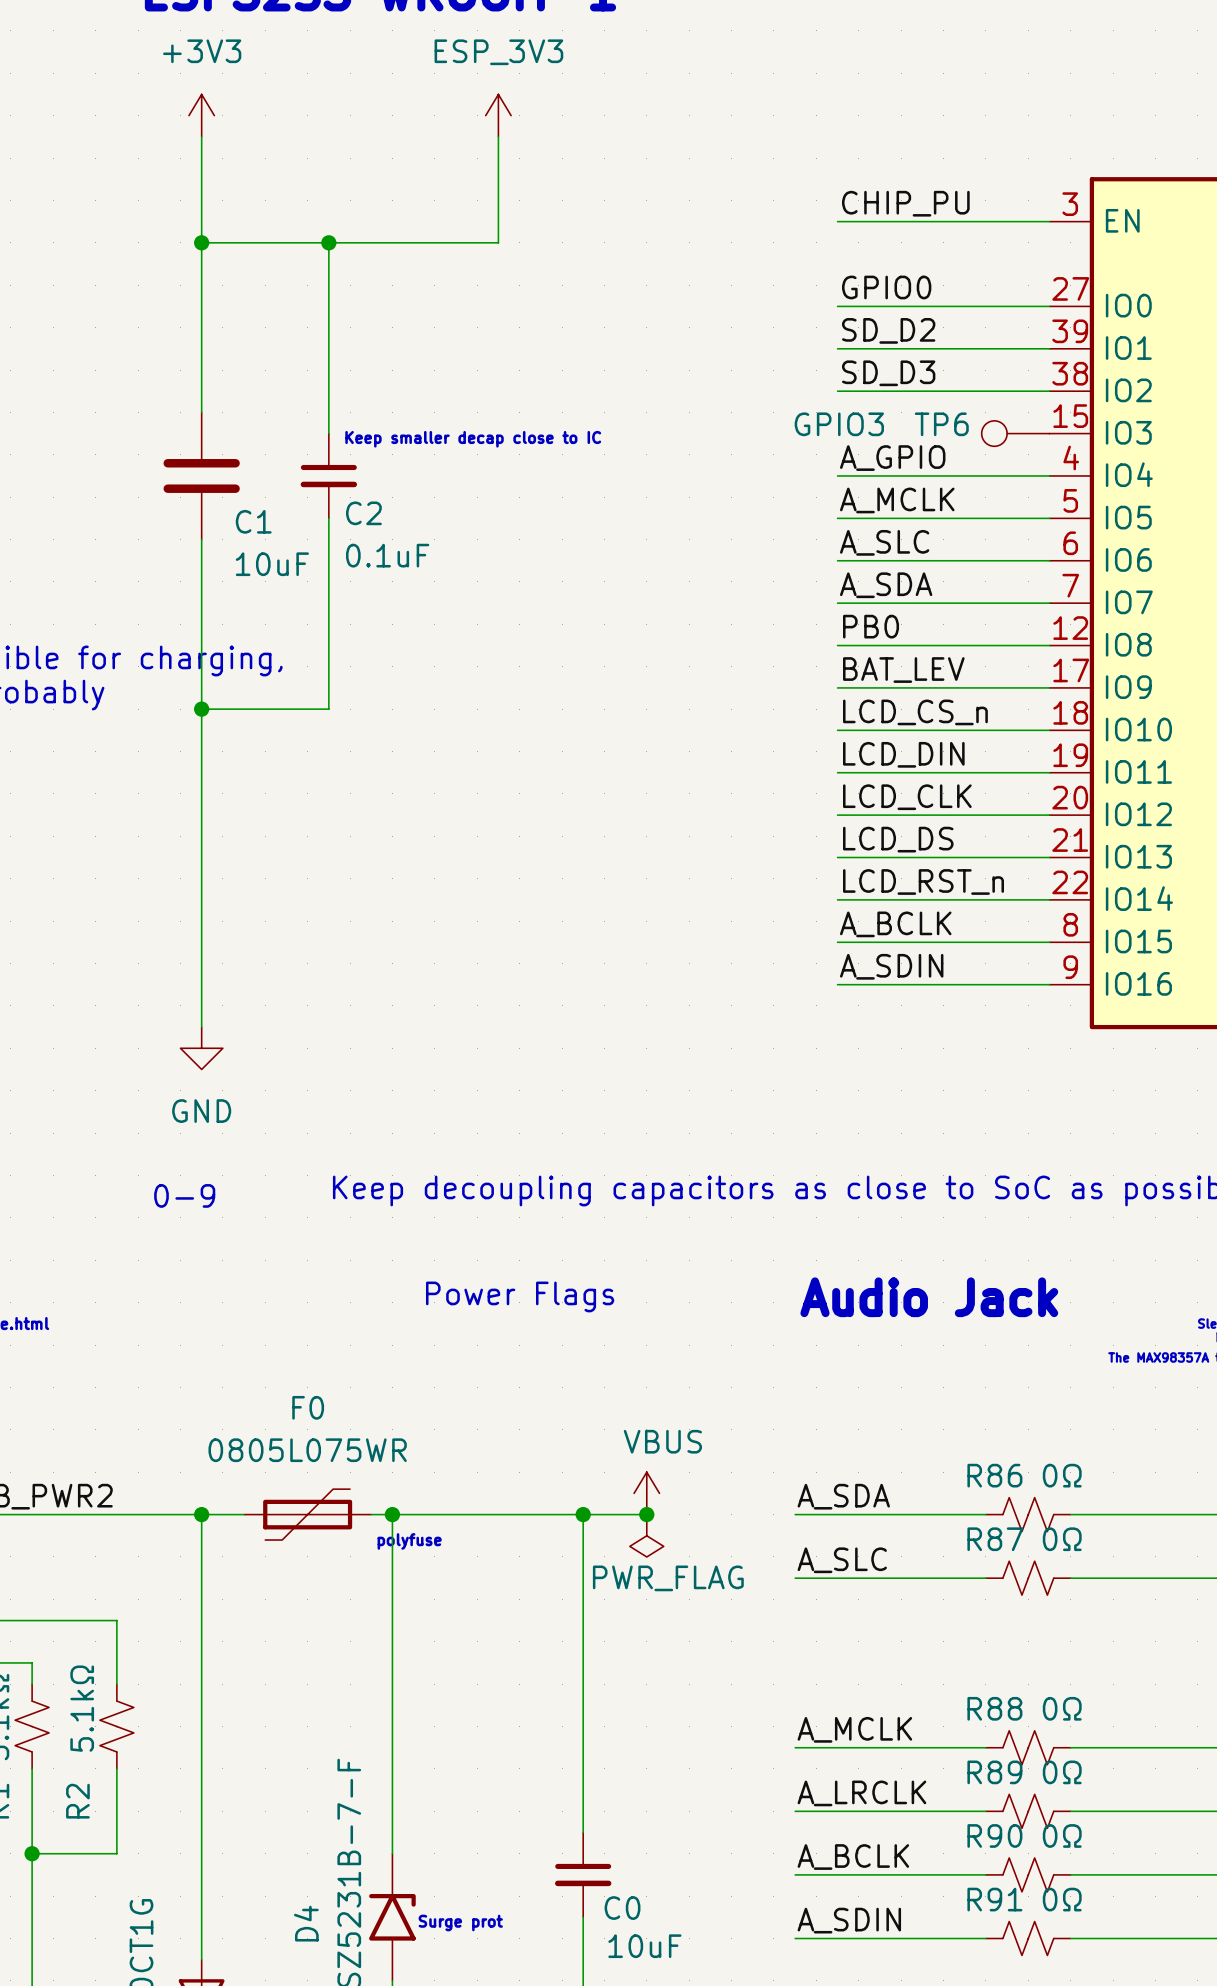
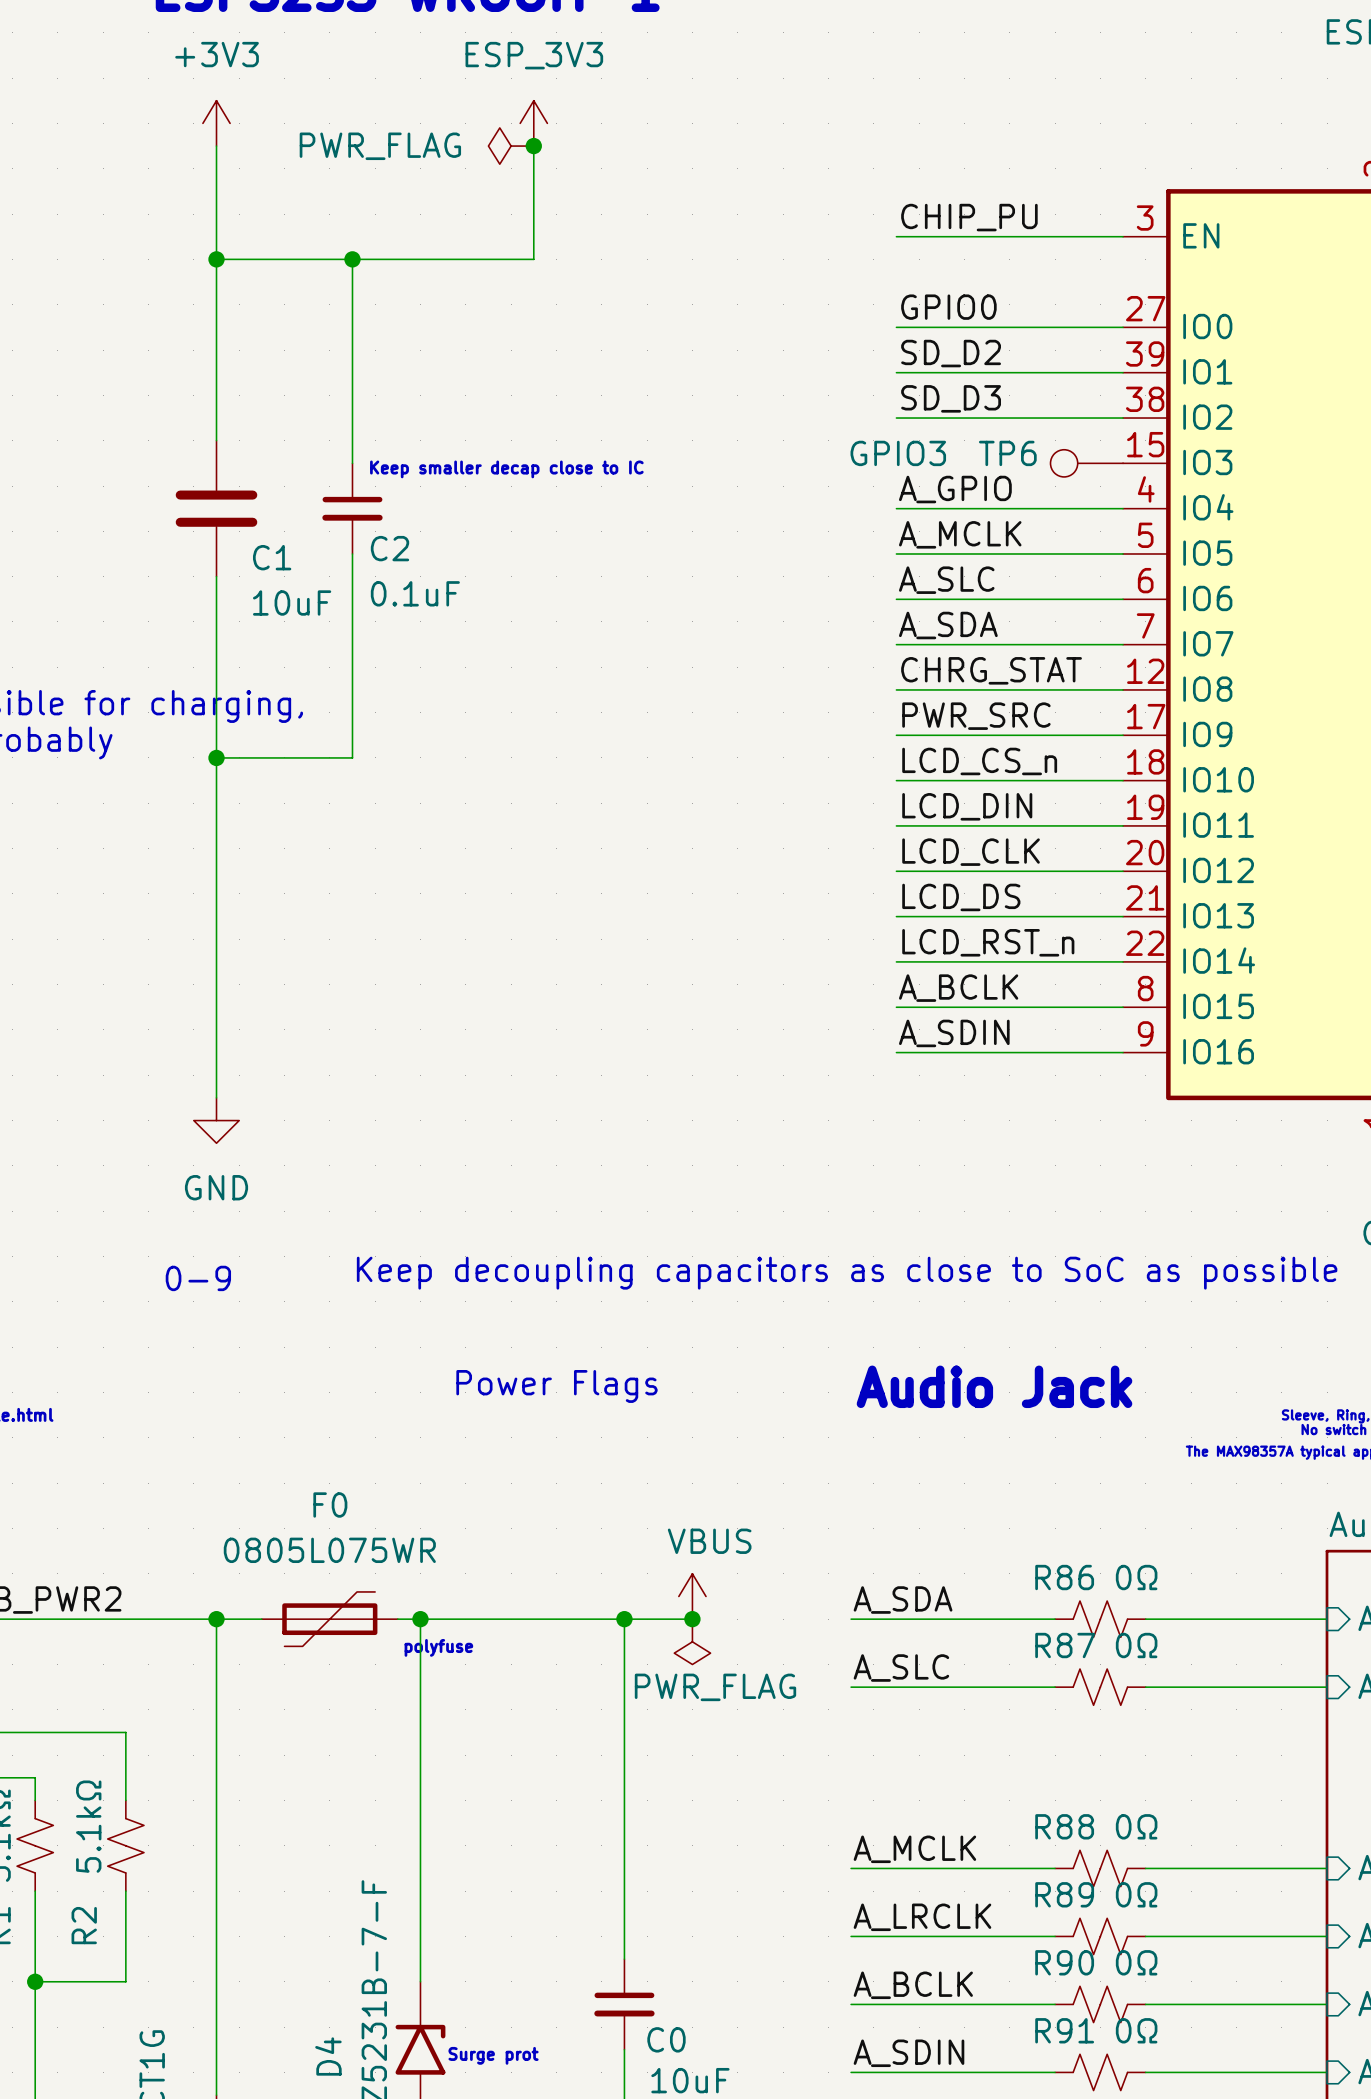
power symbol: none -> PWR_FLAG (511, 146)
junction: none -> (533, 146)
label: PB0 (871, 626) -> CHRG_STAT (991, 670)
label: BAT_LEV (903, 670) -> PWR_SRC (976, 716)

